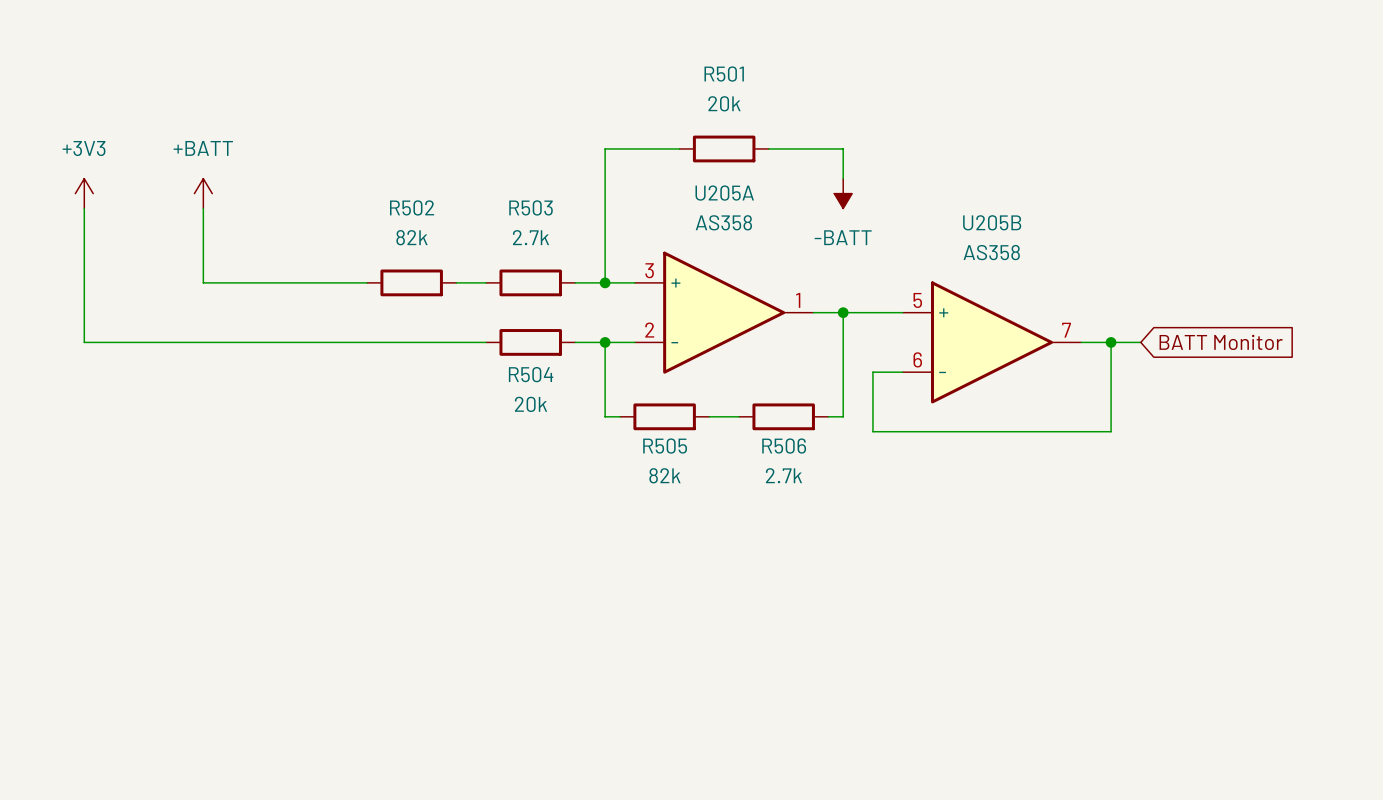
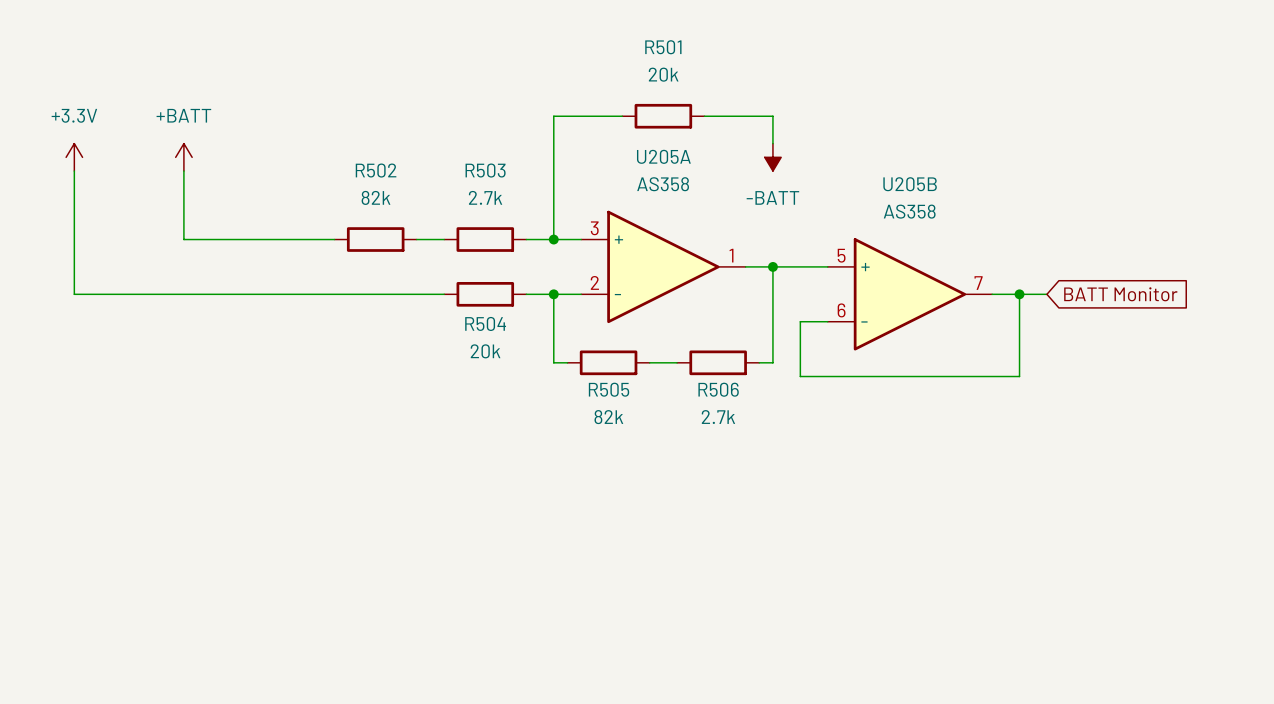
power symbol: +3V3 (84, 193) -> +3.3V (74, 157)

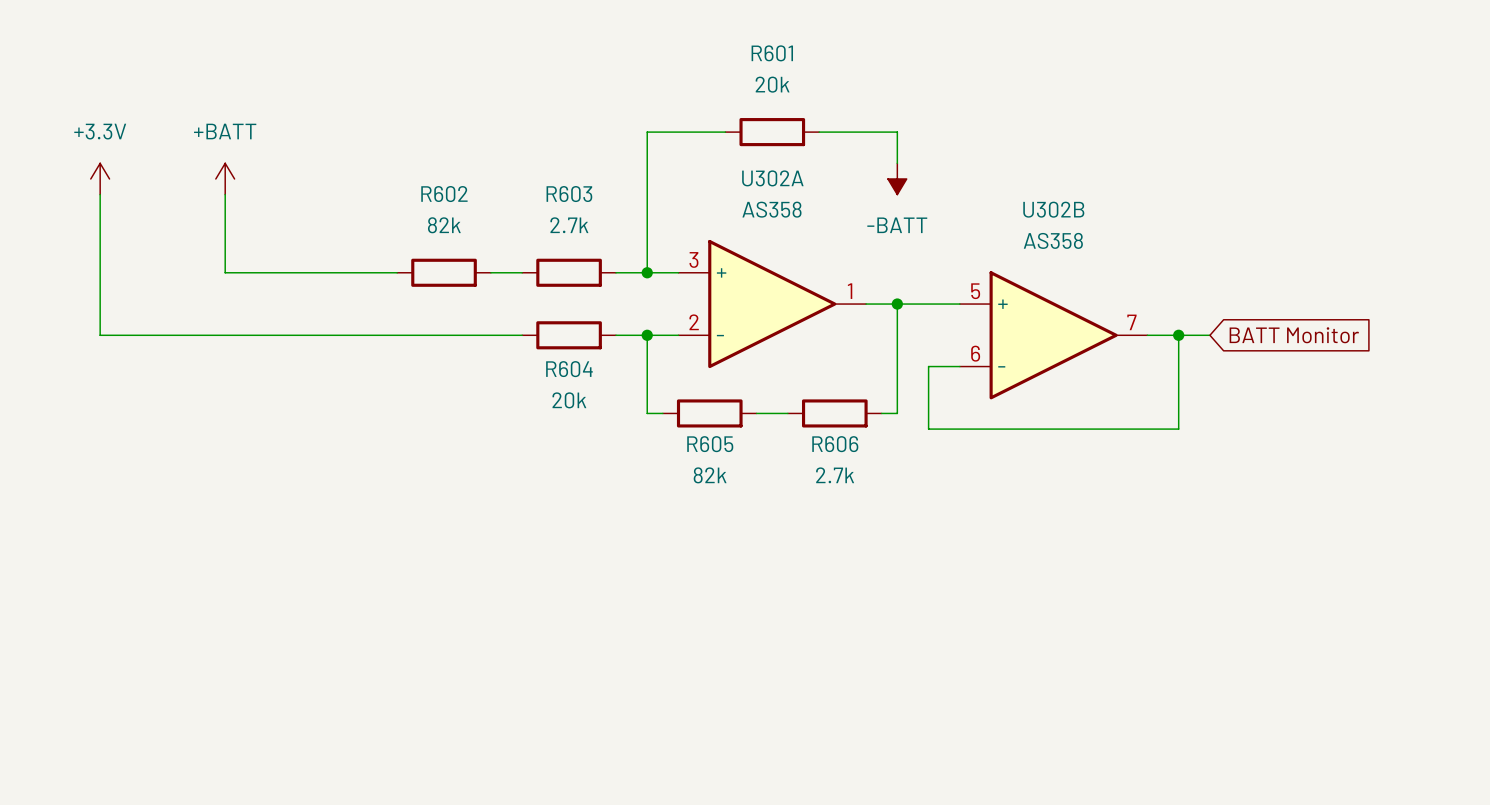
R501 name: R501 (663, 47) -> R601 (772, 53)
U205A name: U205A (663, 156) -> U302A (772, 178)
R502 name: R502 (376, 170) -> R602 (444, 194)
R503 name: R503 (485, 170) -> R603 (569, 194)
U205B name: U205B (910, 184) -> U302B (1053, 209)
R504 name: R504 (485, 323) -> R604 (569, 369)
R505 name: R505 (609, 389) -> R605 (710, 444)
R506 name: R506 (718, 389) -> R606 (835, 444)

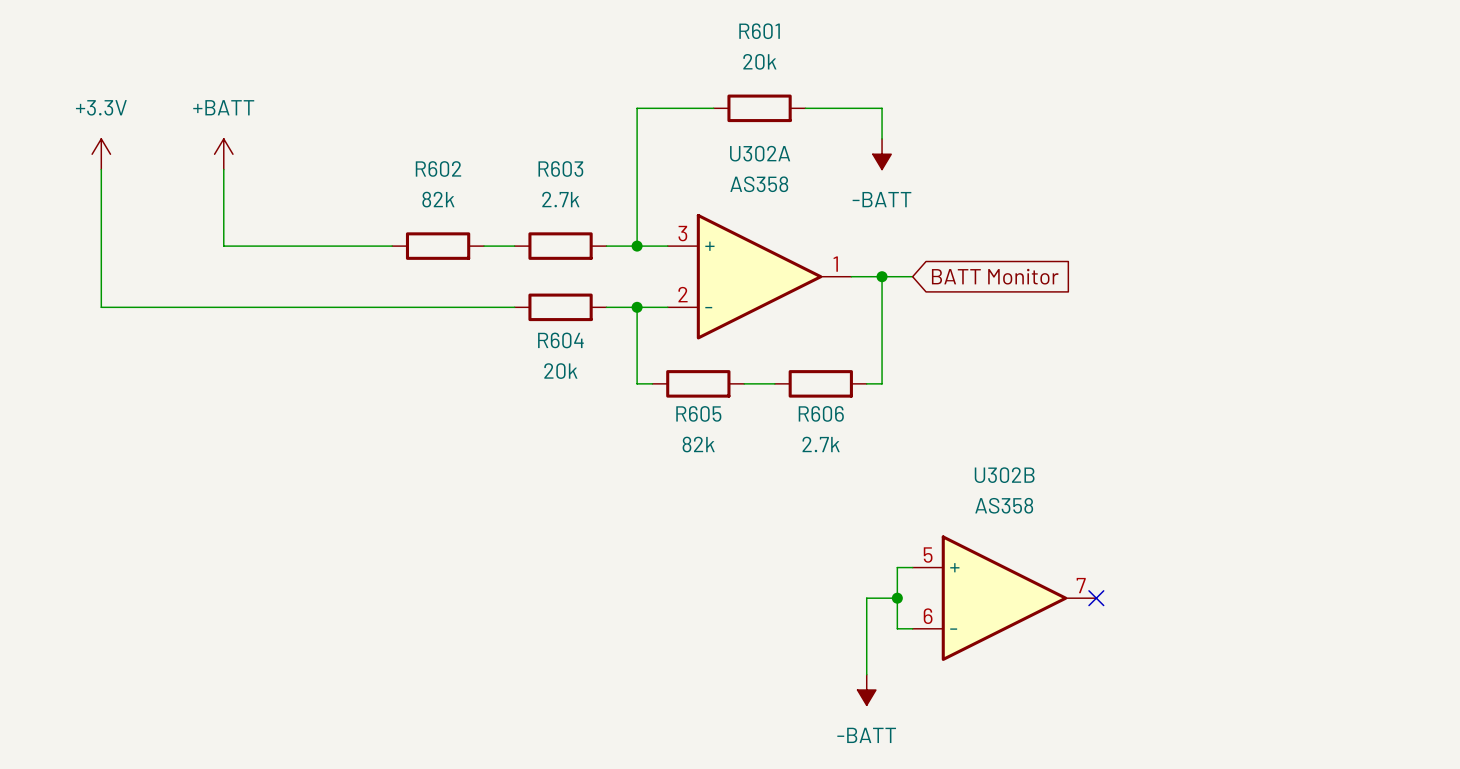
wire: (928, 304) (959, 304) -> none
U302B position: (1053, 335) -> (1004, 598)
wire: (1147, 335) (1209, 335) -> none
wire: (1178, 335) (1178, 429) (928, 429) (928, 366) (959, 366) -> none
junction: (1178, 335) -> none
global label position: BATT Monitor (1294, 335) -> BATT Monitor (995, 276)
wire: none -> (912, 567) (897, 567) (897, 628) (912, 628)
wire: none -> (897, 598) (866, 598) (866, 674)
junction: none -> (897, 598)
no-connect mark: none -> (1096, 598)
power symbol: none -> -BATT (866, 690)

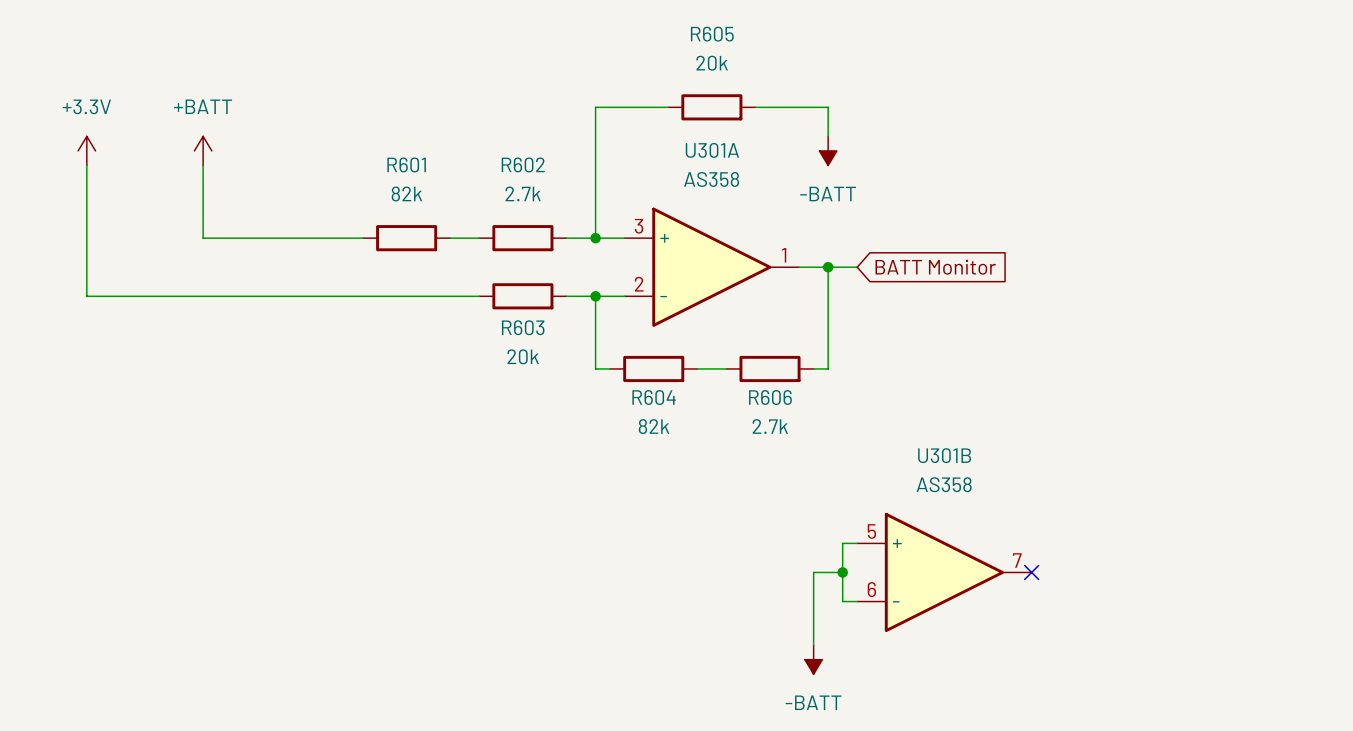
R601 name: R601 (759, 31) -> R605 (712, 34)
U302A name: U302A (760, 153) -> U301A (712, 150)
R602 name: R602 (438, 168) -> R601 (406, 164)
R603 name: R603 (560, 168) -> R602 (523, 164)
R604 name: R604 (560, 340) -> R603 (523, 327)
R605 name: R605 (698, 413) -> R604 (654, 397)
U302B name: U302B (1004, 475) -> U301B (944, 455)

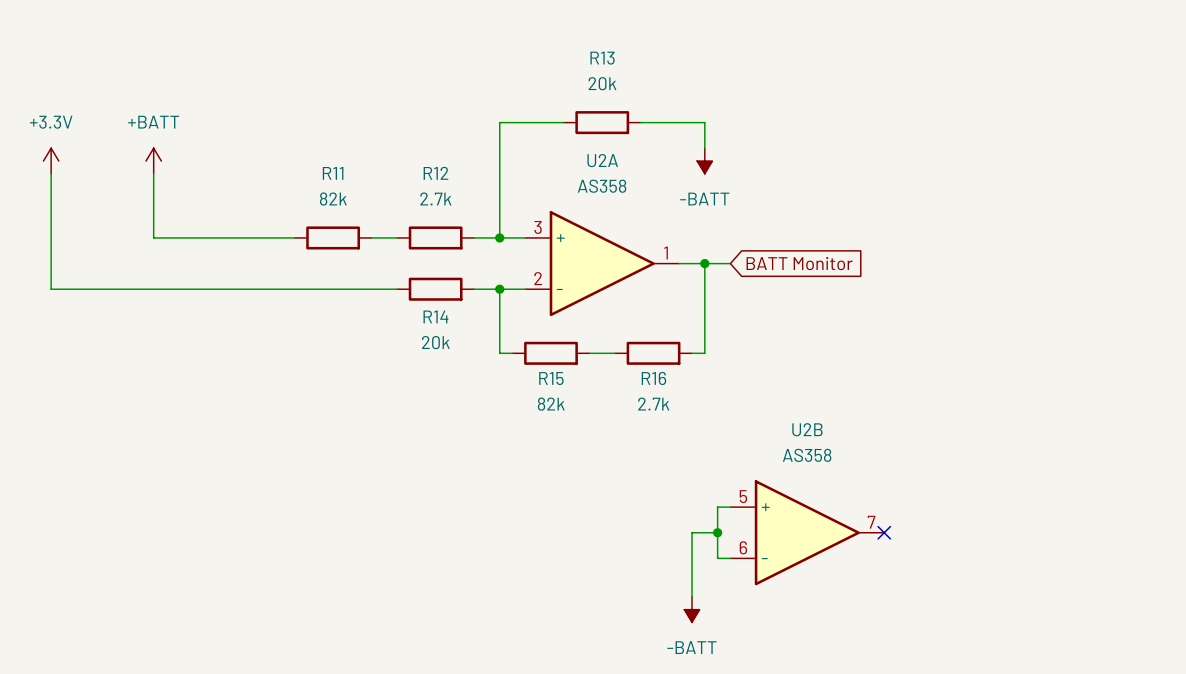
R605 name: R605 (712, 34) -> R13 (602, 58)
U301A name: U301A (712, 150) -> U2A (602, 160)
R601 name: R601 (406, 164) -> R11 (333, 173)
R602 name: R602 (523, 164) -> R12 (435, 173)
R603 name: R603 (523, 327) -> R14 (435, 316)
R604 name: R604 (654, 397) -> R15 (551, 378)
R606 name: R606 (770, 397) -> R16 (653, 378)
U301B name: U301B (944, 455) -> U2B (807, 429)

